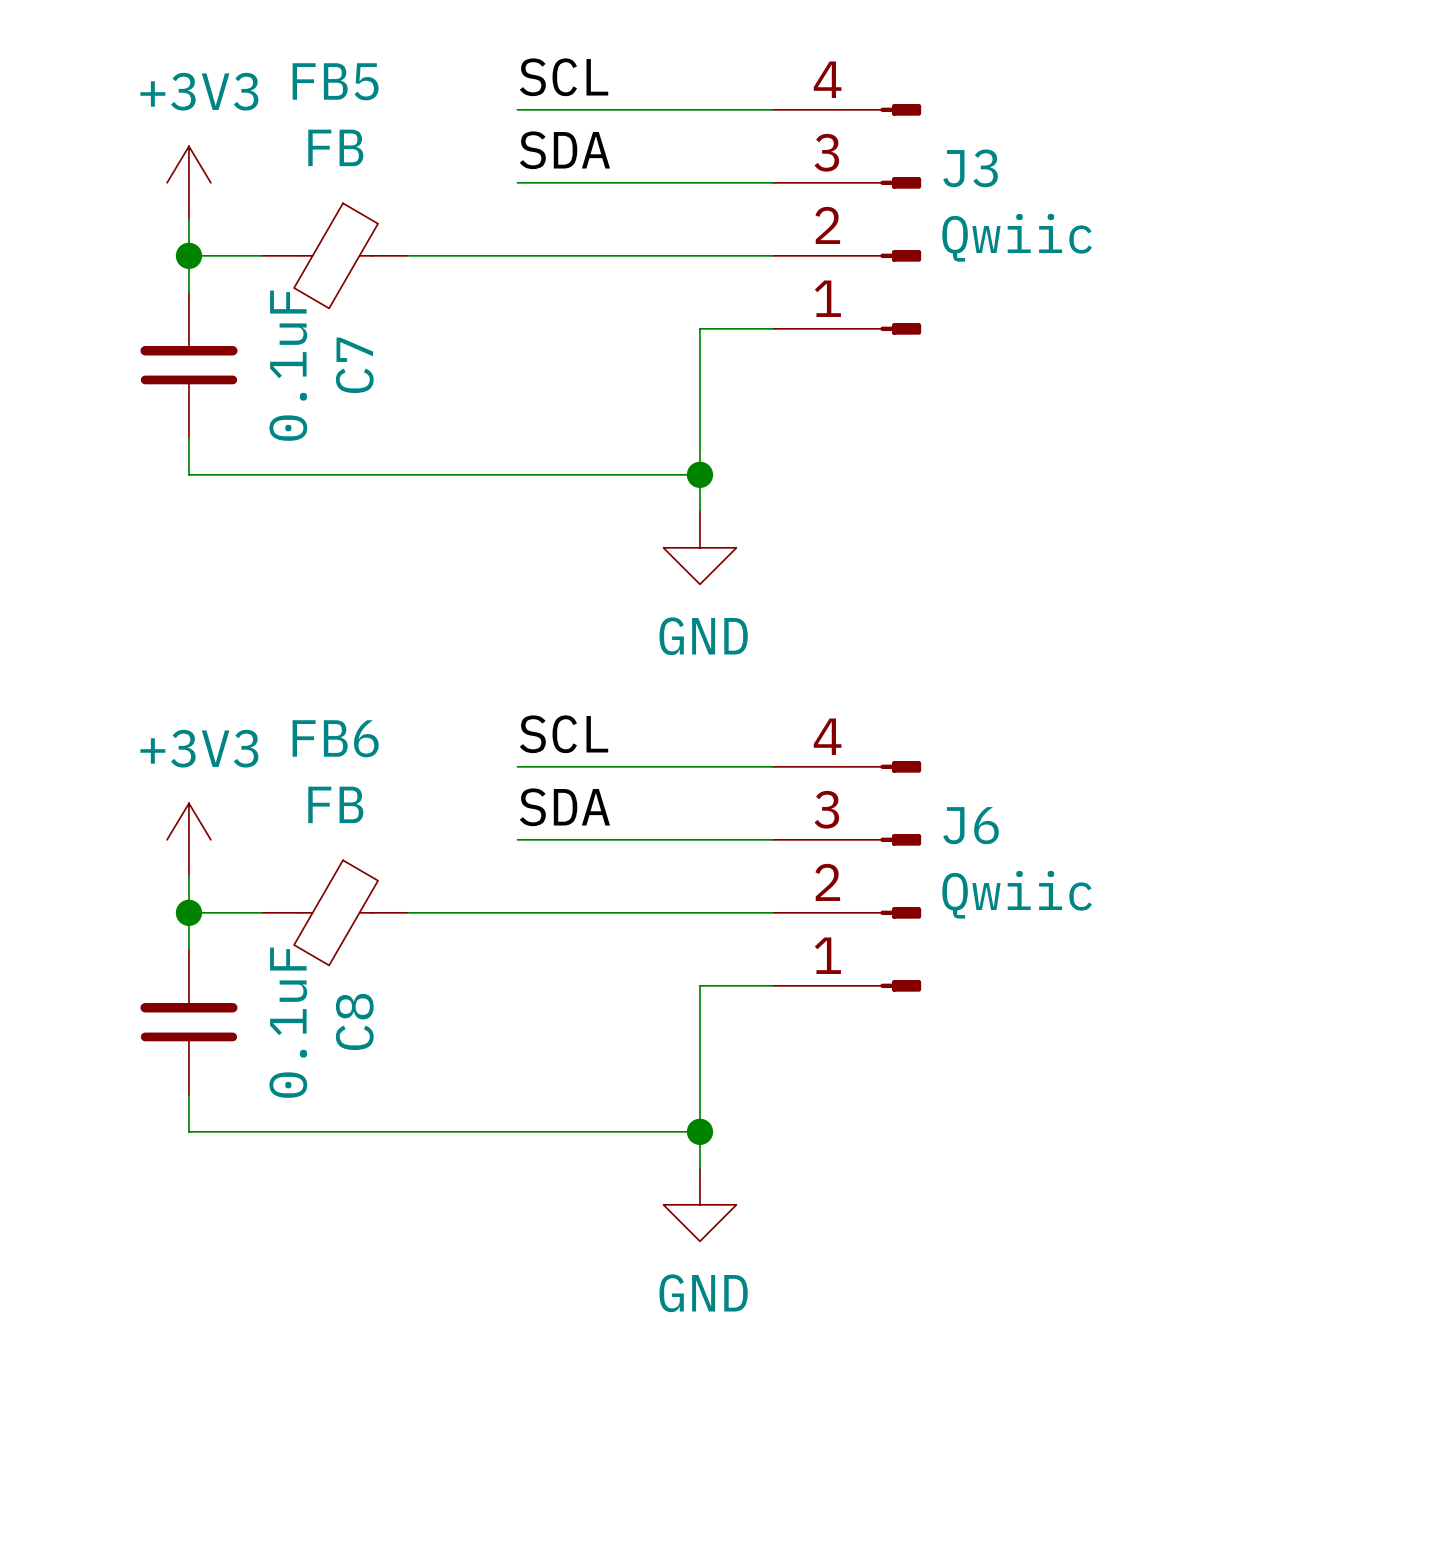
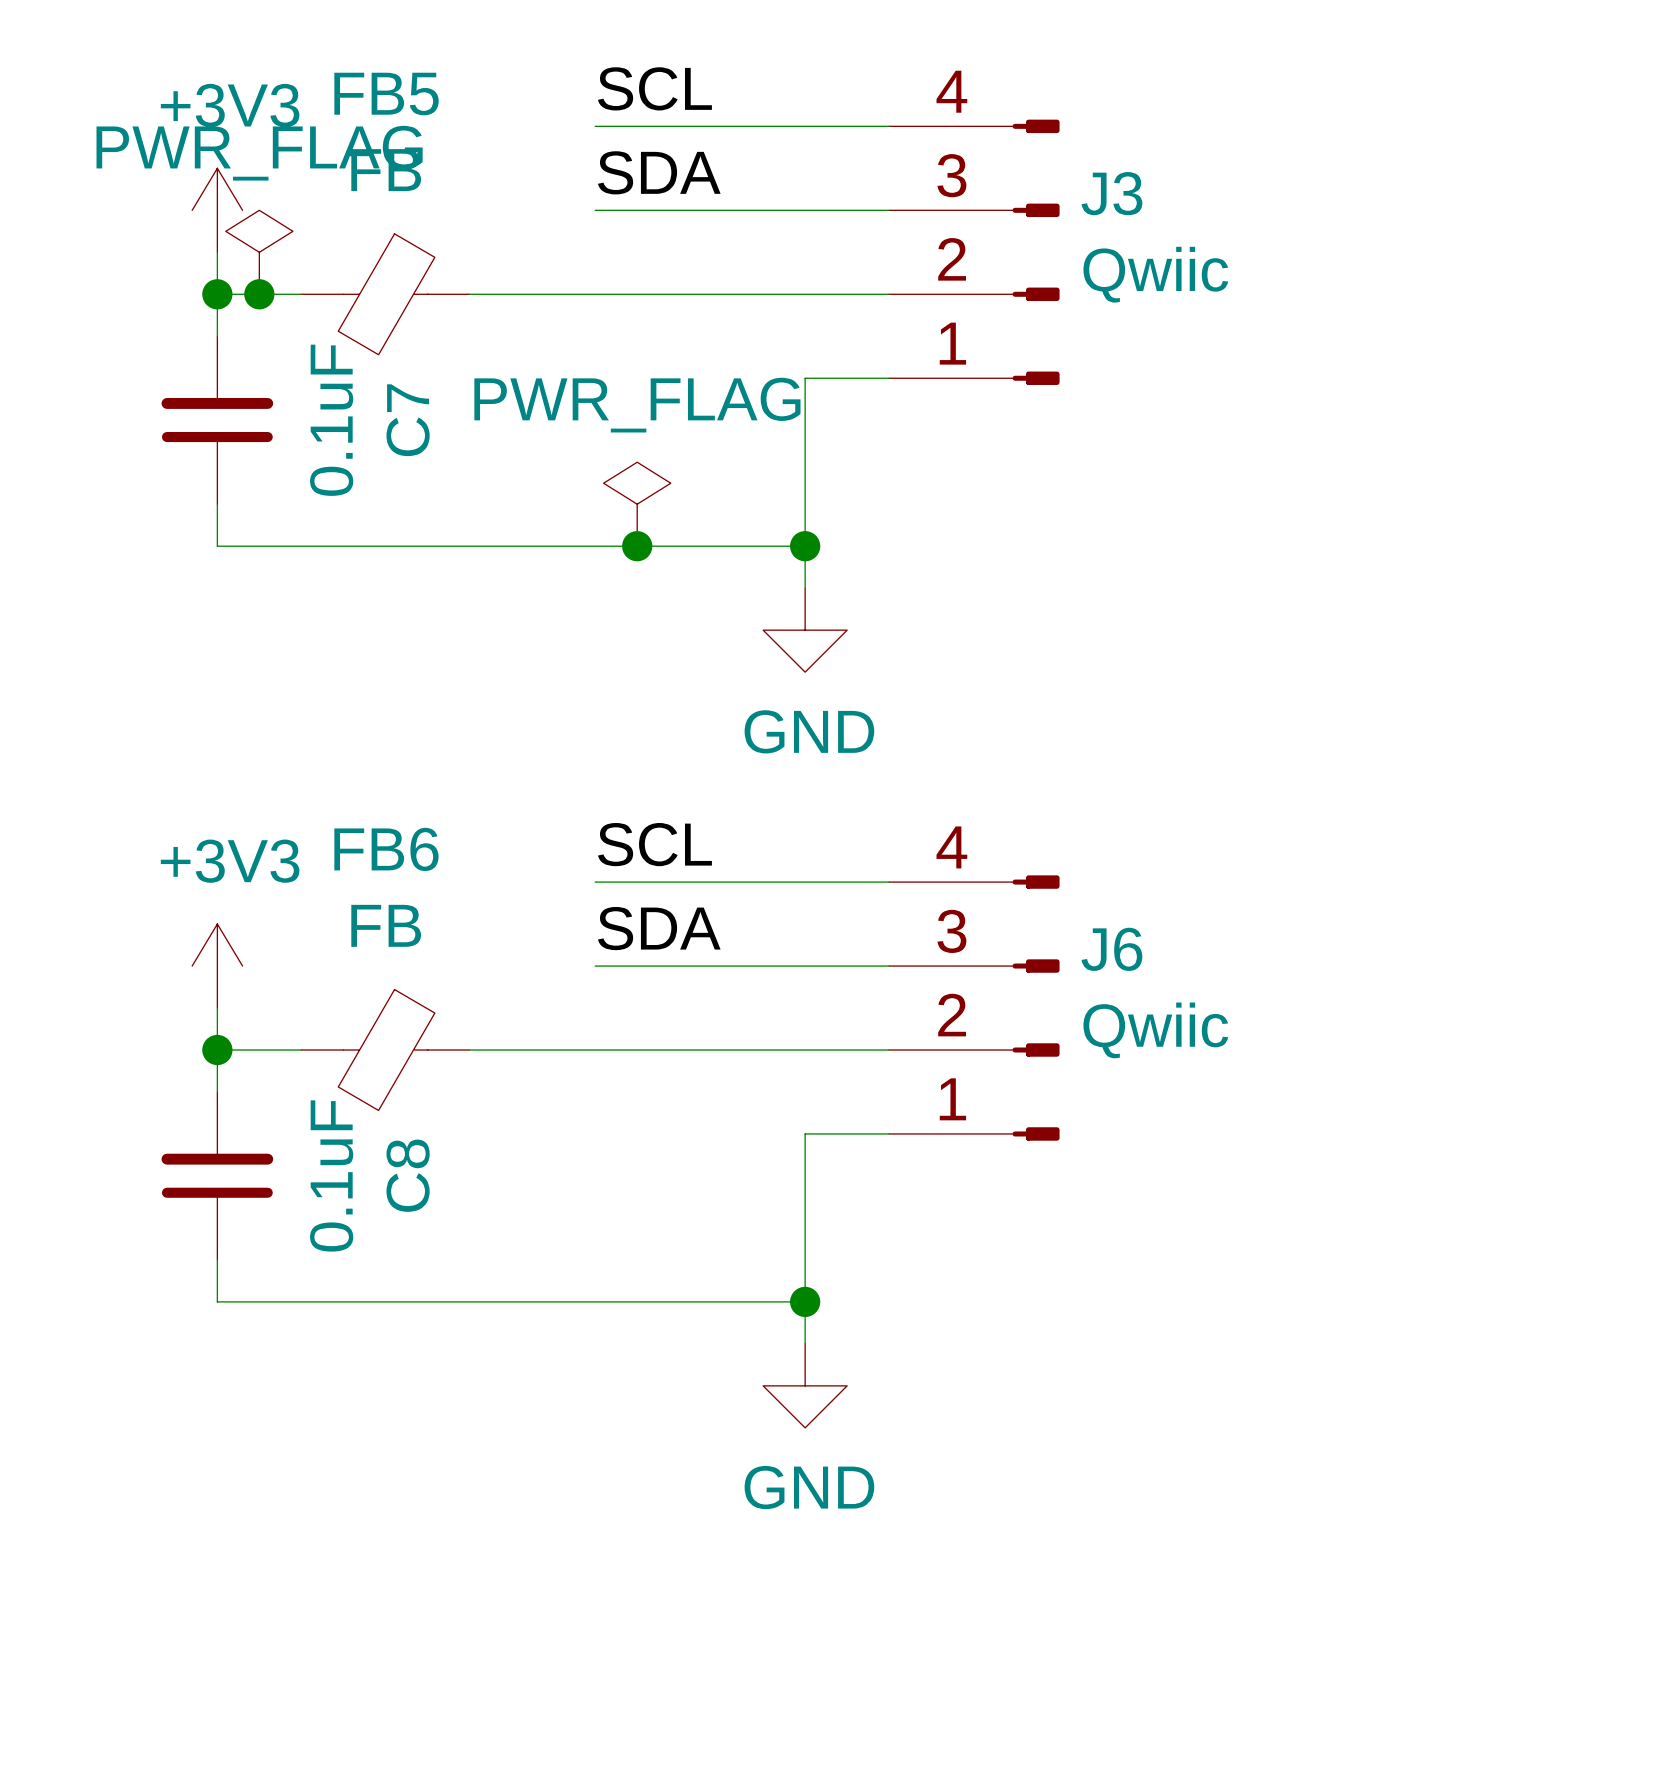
power symbol: none -> PWR_FLAG (259, 252)
junction: none -> (259, 294)
power symbol: none -> PWR_FLAG (637, 504)
junction: none -> (637, 546)

